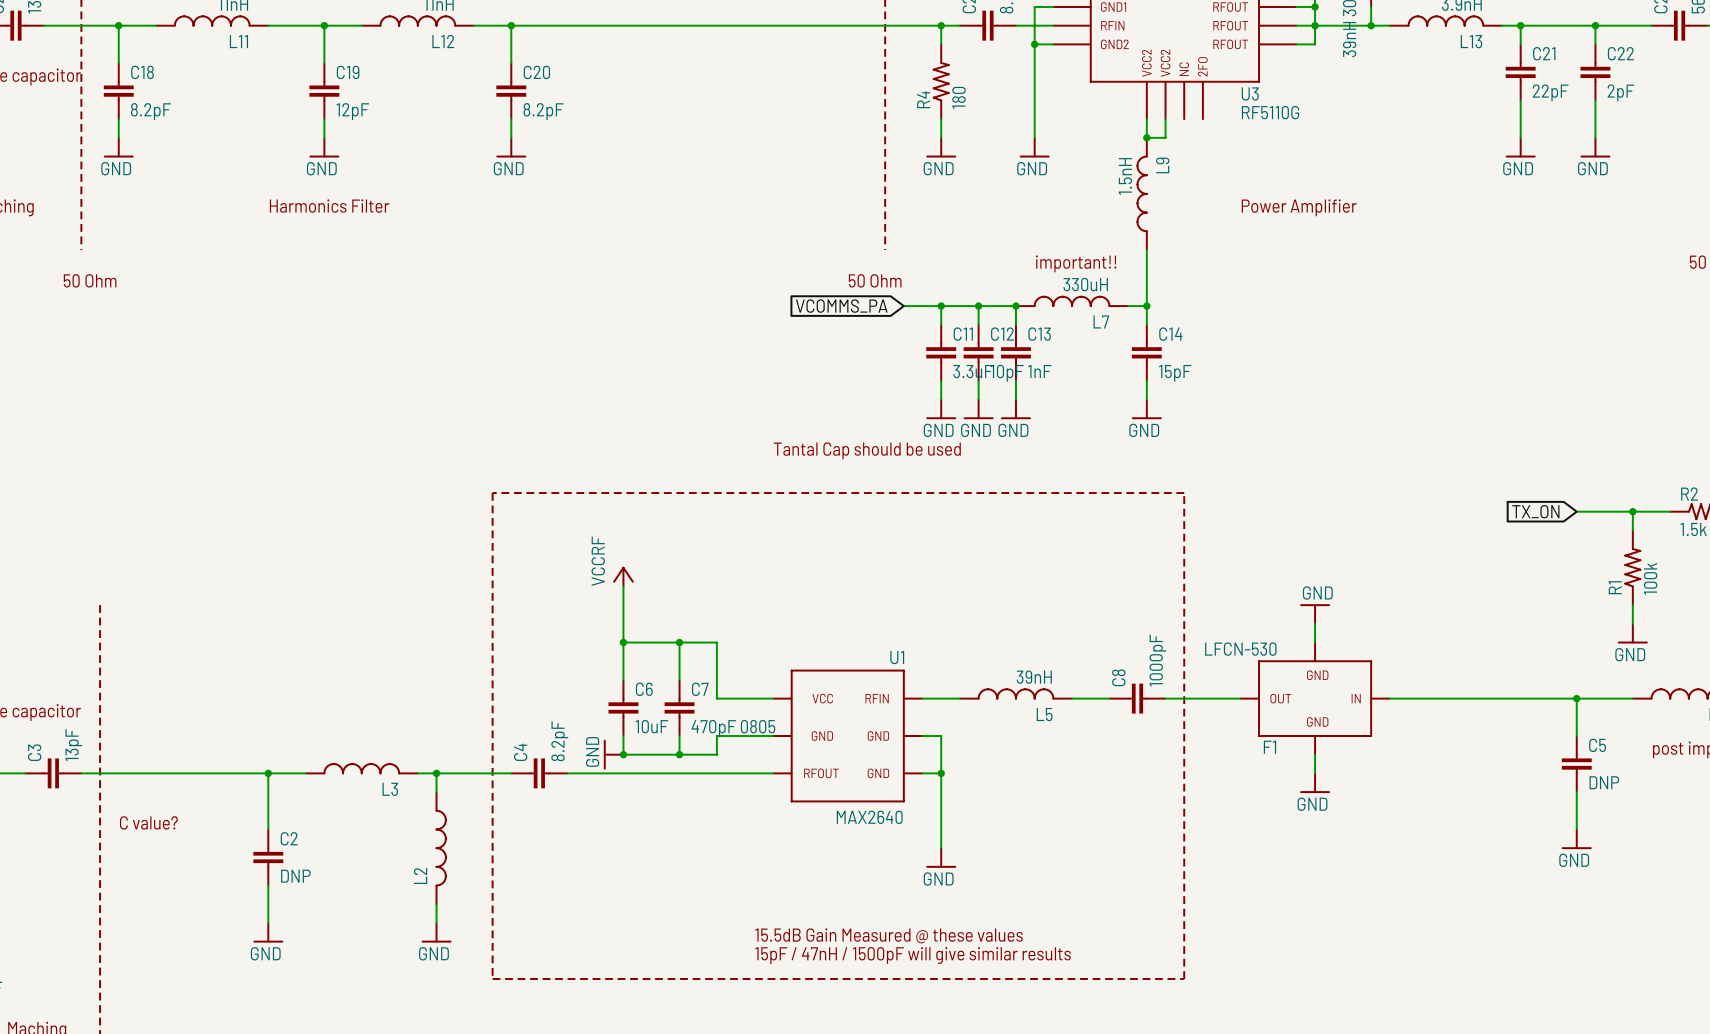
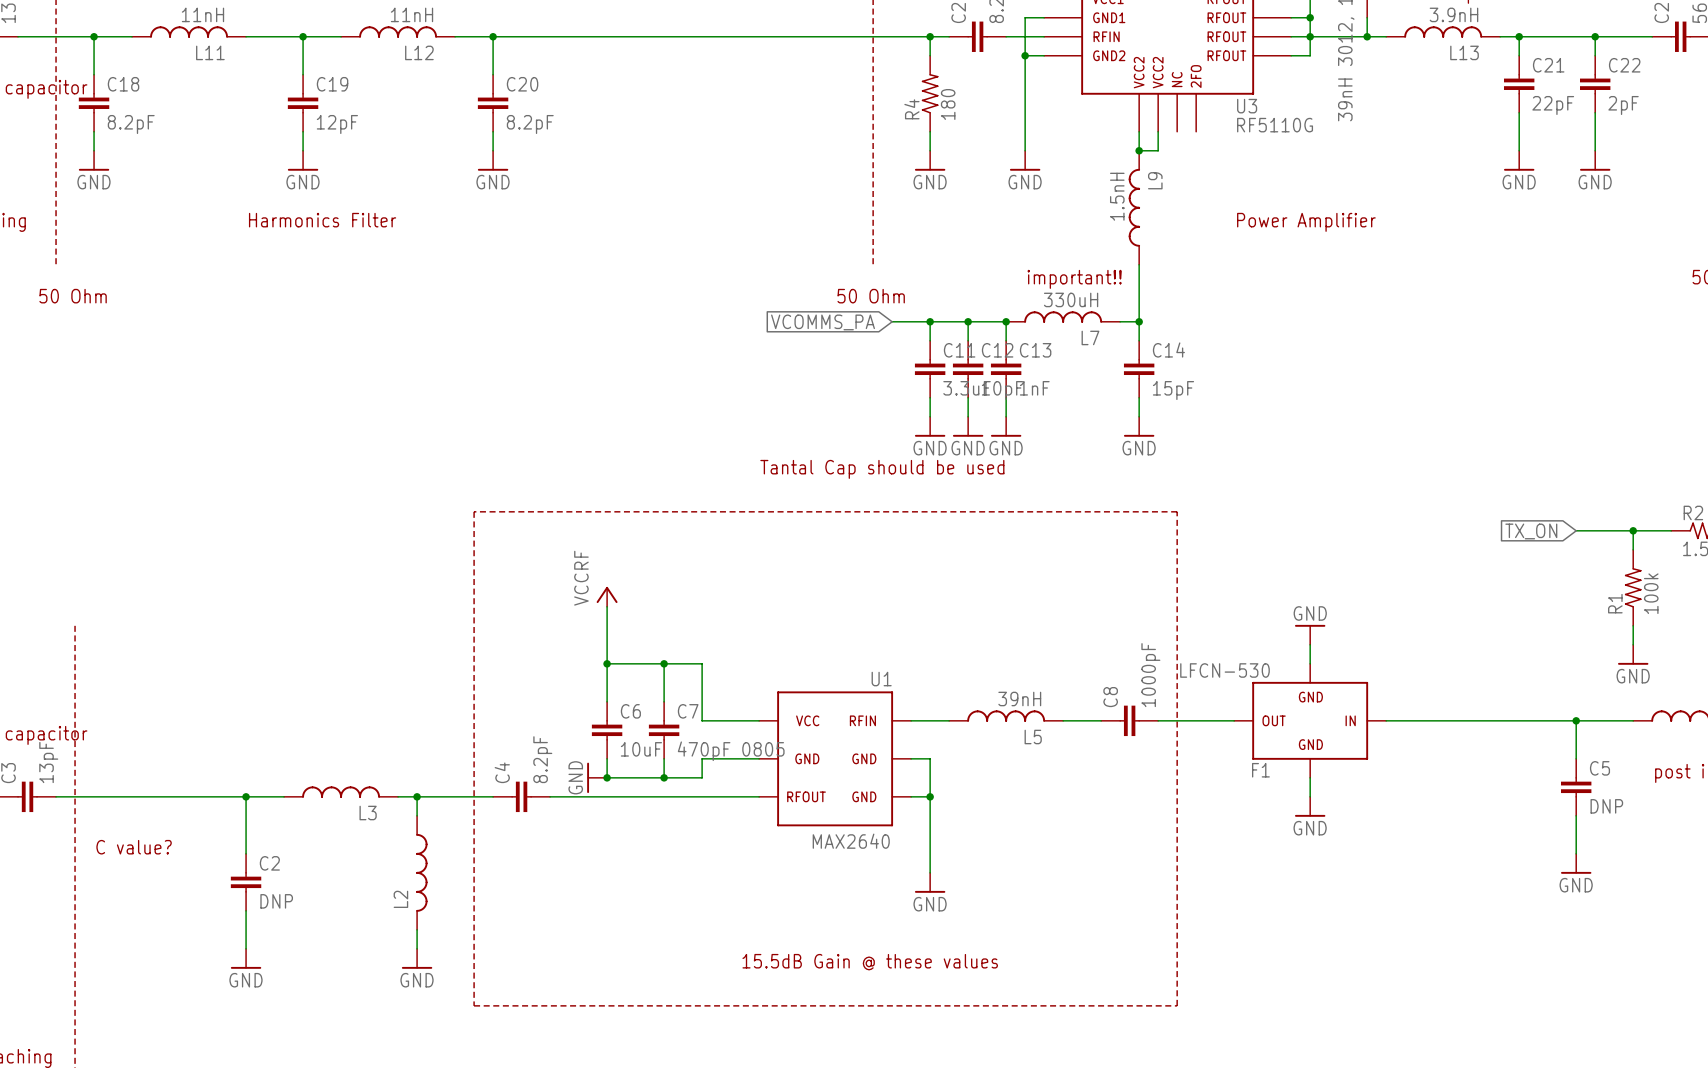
text: 15.5dB Gain Measured @ these values (889, 935) -> 15.5dB Gain @ these values (870, 962)
text: 15pF / 47nH / 1500pF will give similar results (913, 955) -> none

